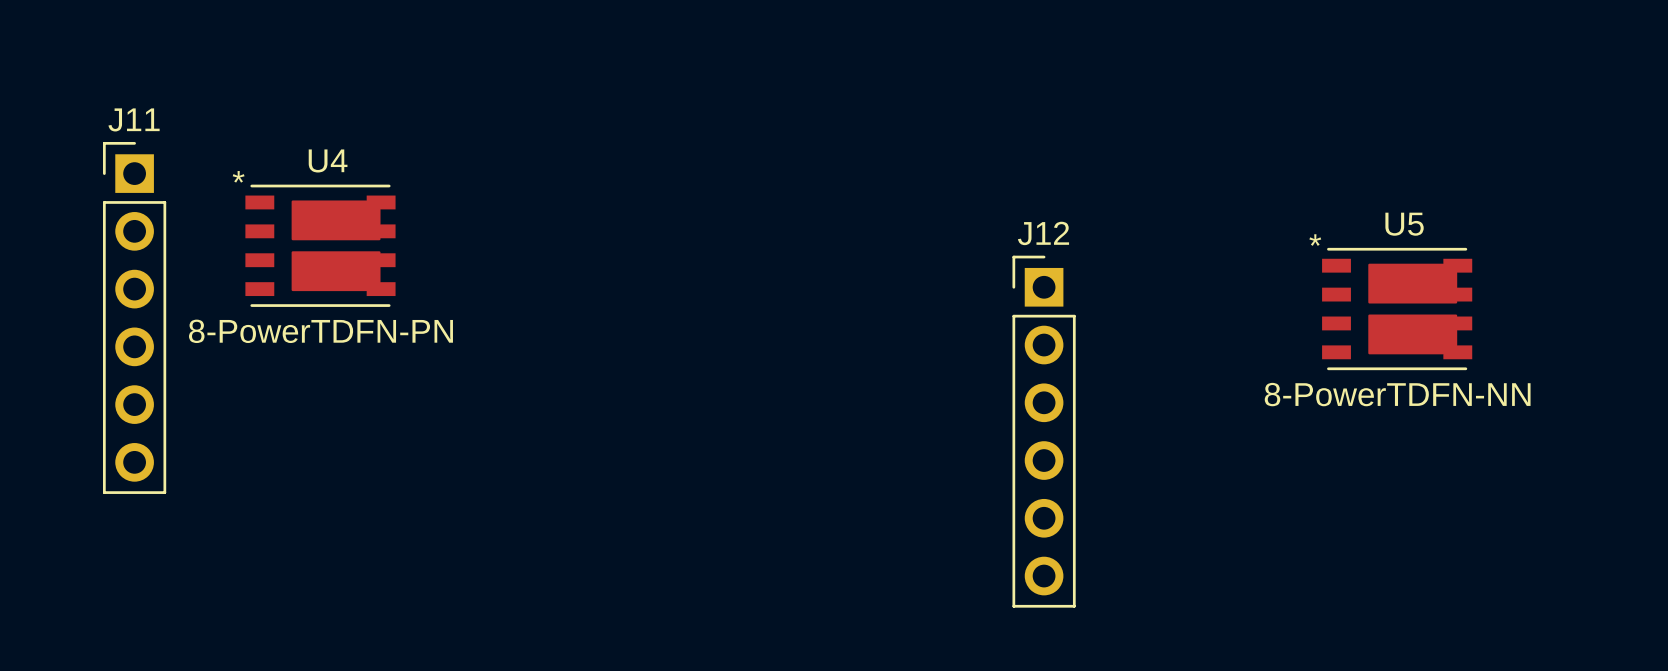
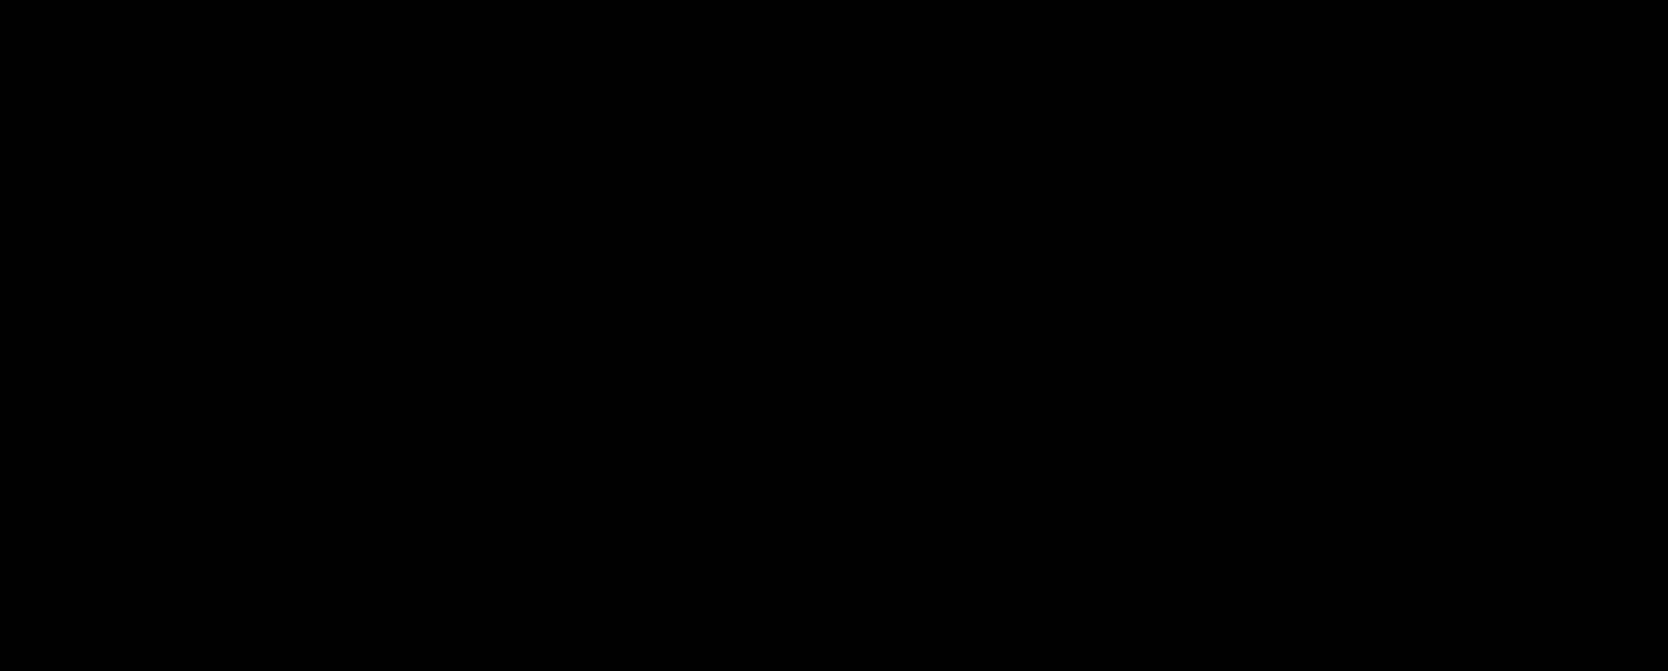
U4: 8-PowerTDFN-PN (320, 245) -> none
U5: 8-PowerTDFN-NN (1397, 309) -> none
J11: (134, 317) -> none
J12: (1044, 431) -> none

